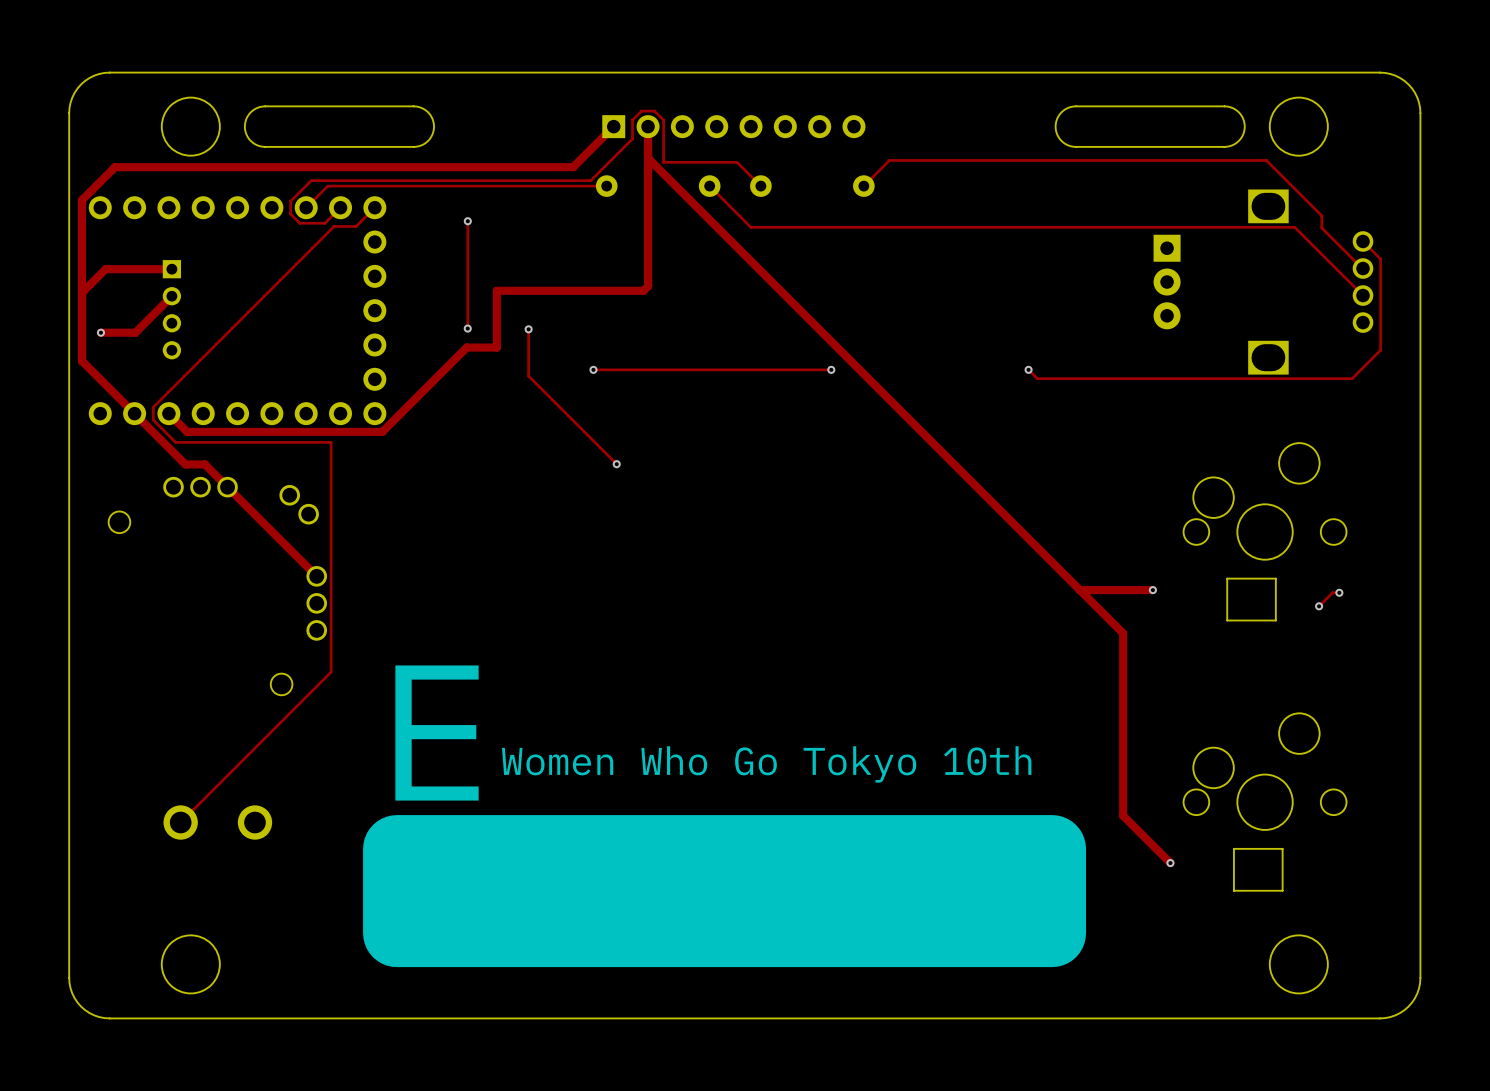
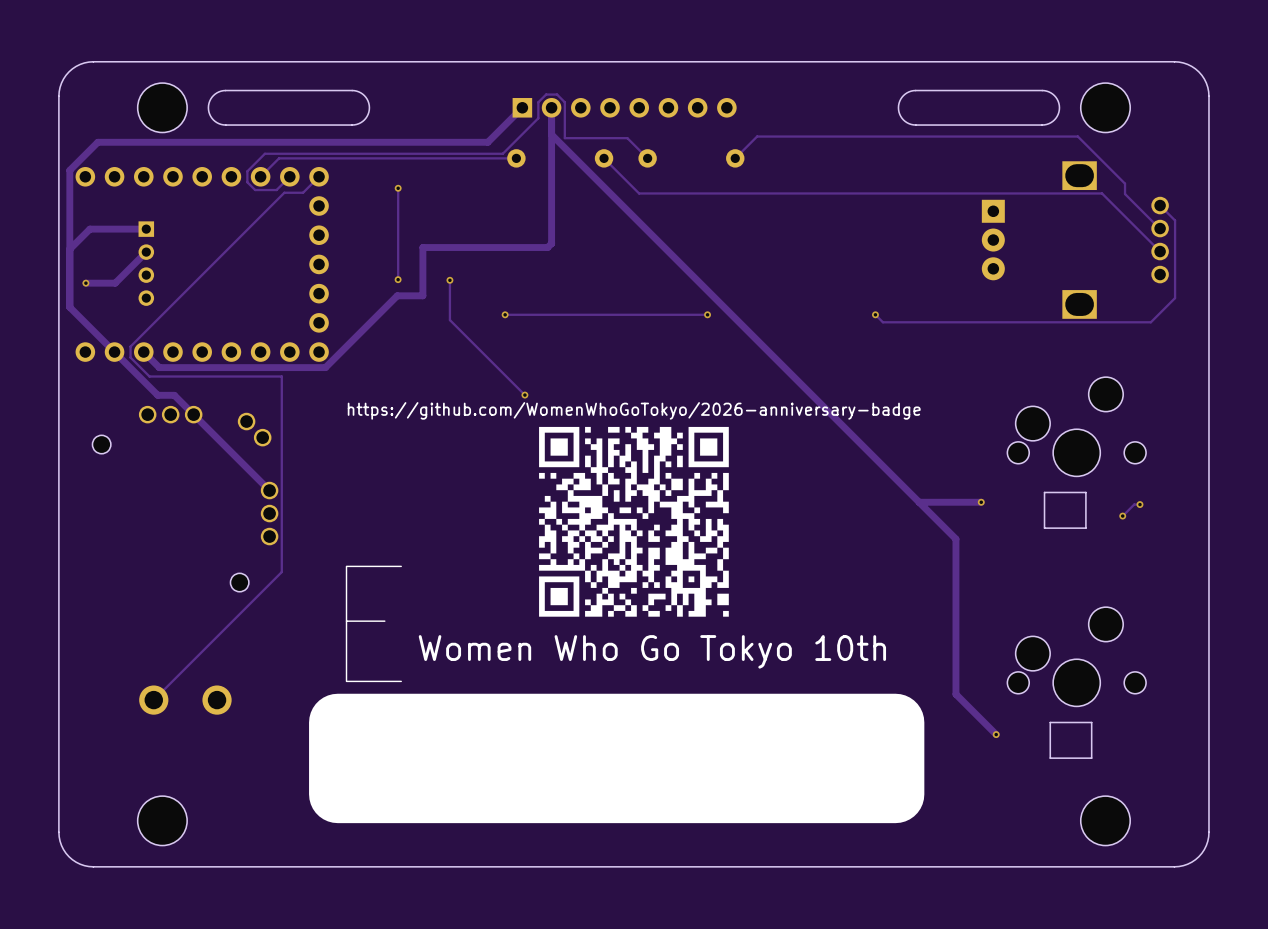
drawing: none -> [539, 426, 729, 617]

